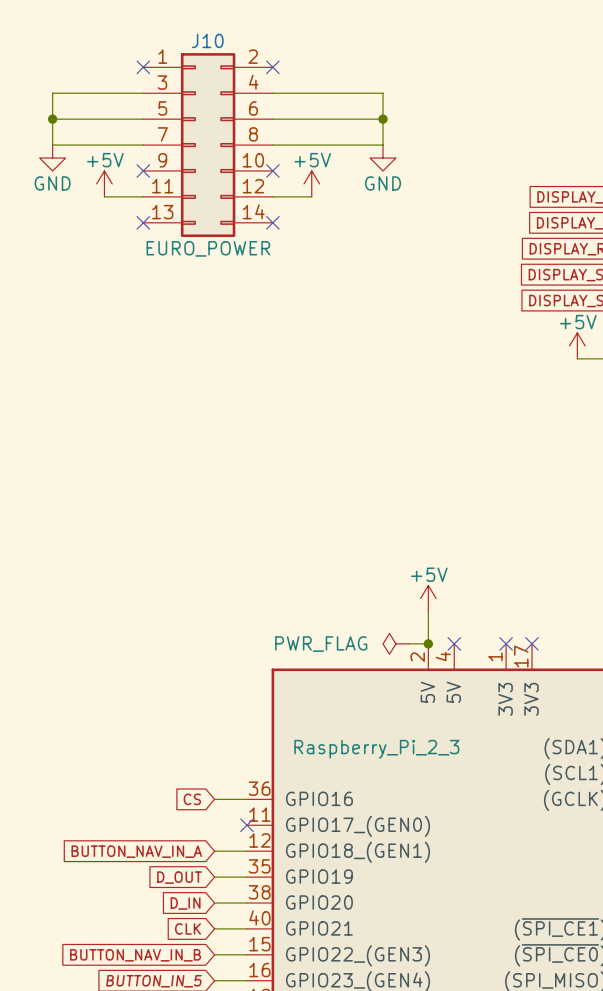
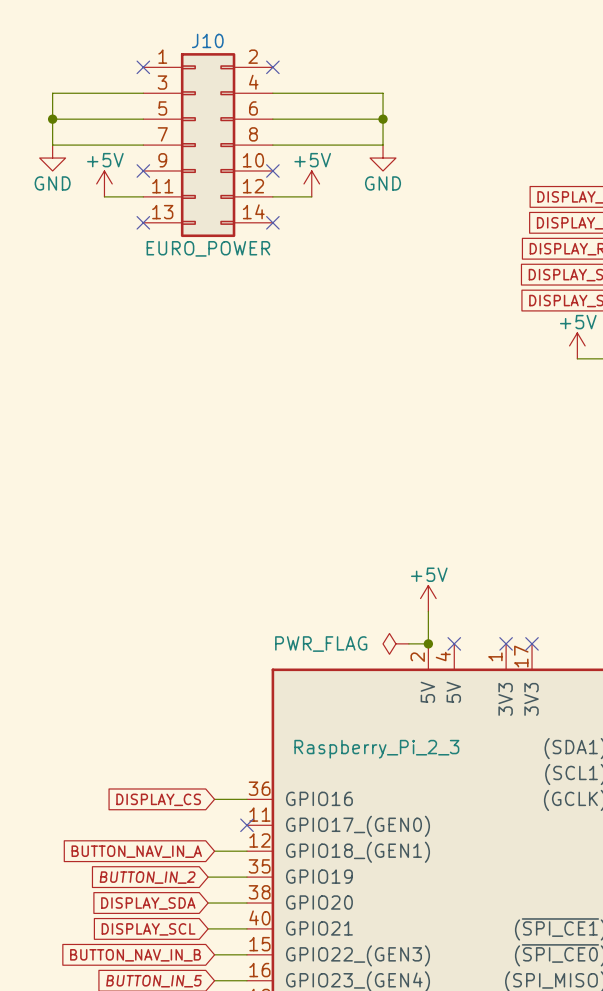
global label: CS (192, 799) -> DISPLAY_CS (158, 799)
global label: D_OUT (179, 877) -> BUTTON_IN_2 (147, 877)
wire: none -> (208, 877) (214, 877)
global label: D_IN (185, 903) -> DISPLAY_SDA (148, 903)
wire: none -> (208, 903) (214, 903)
global label: CLK (188, 928) -> DISPLAY_SCL (148, 929)
wire: none -> (208, 928) (214, 928)

